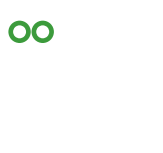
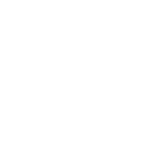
part: (31, 31) -> none

